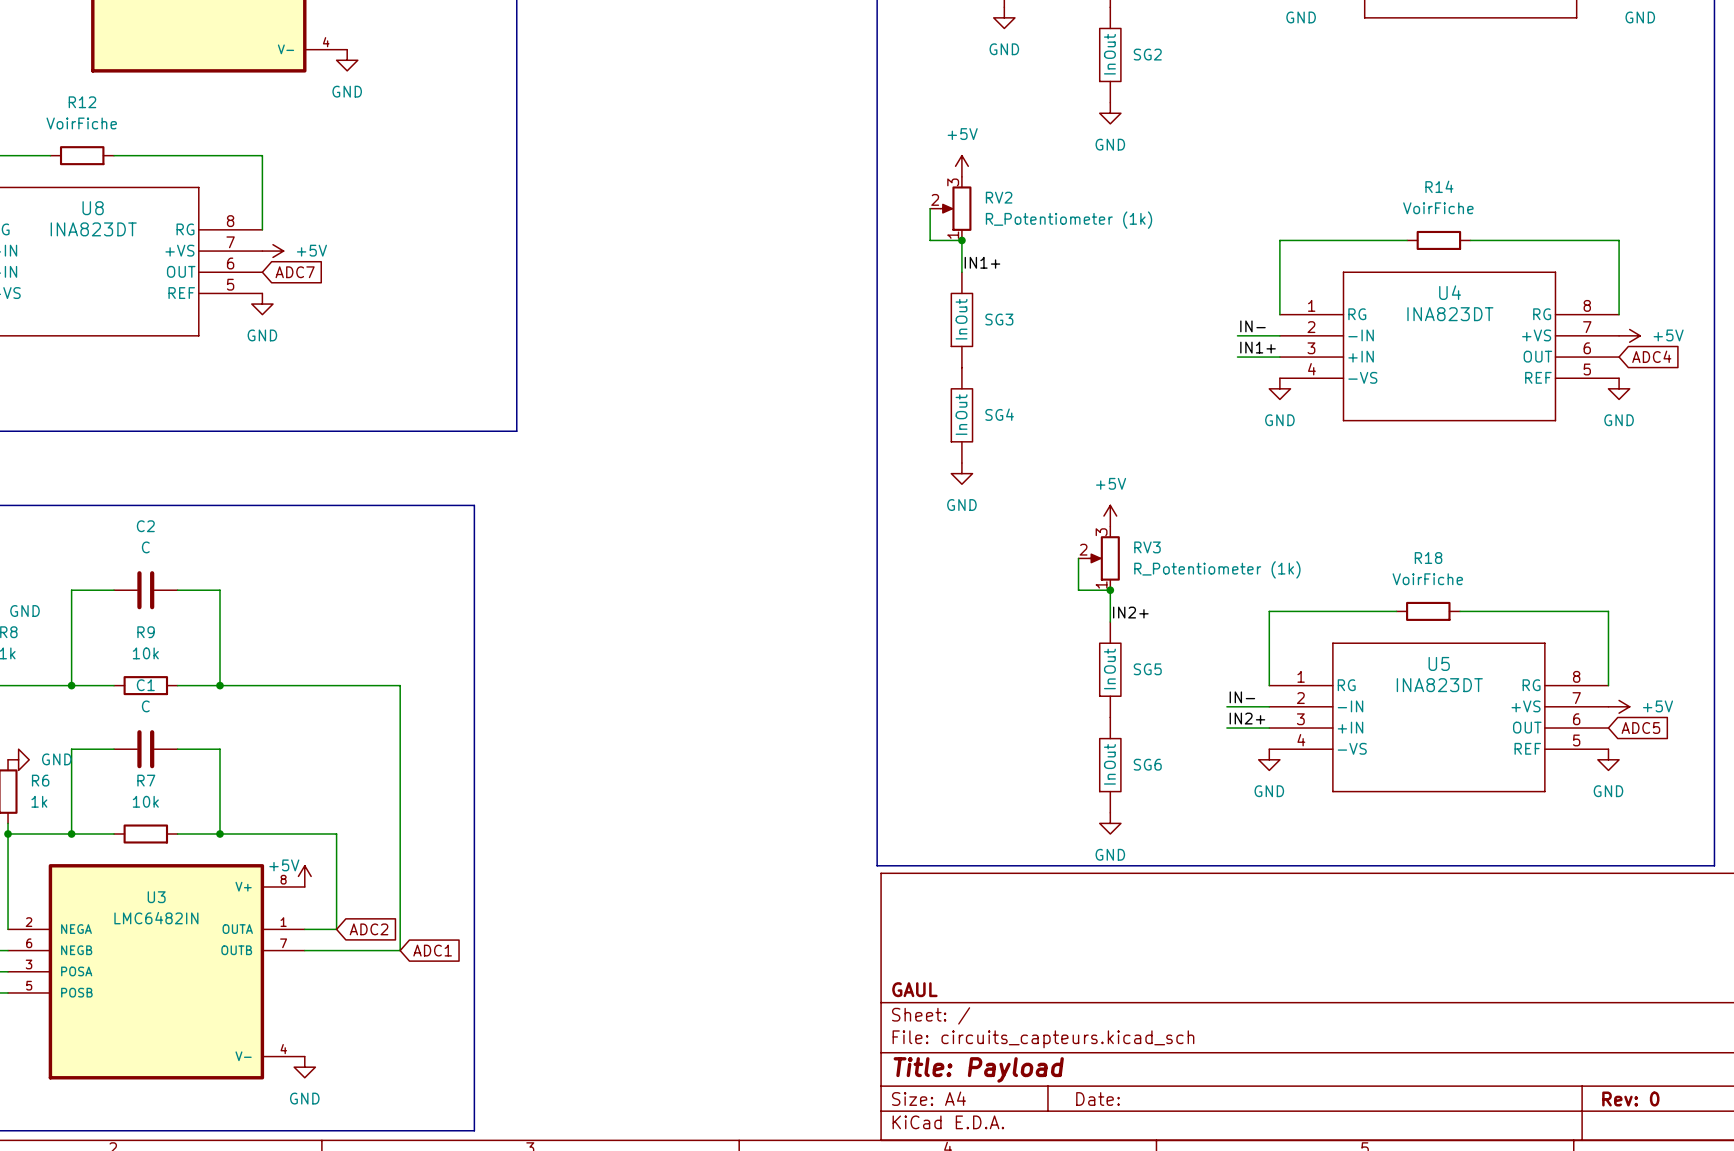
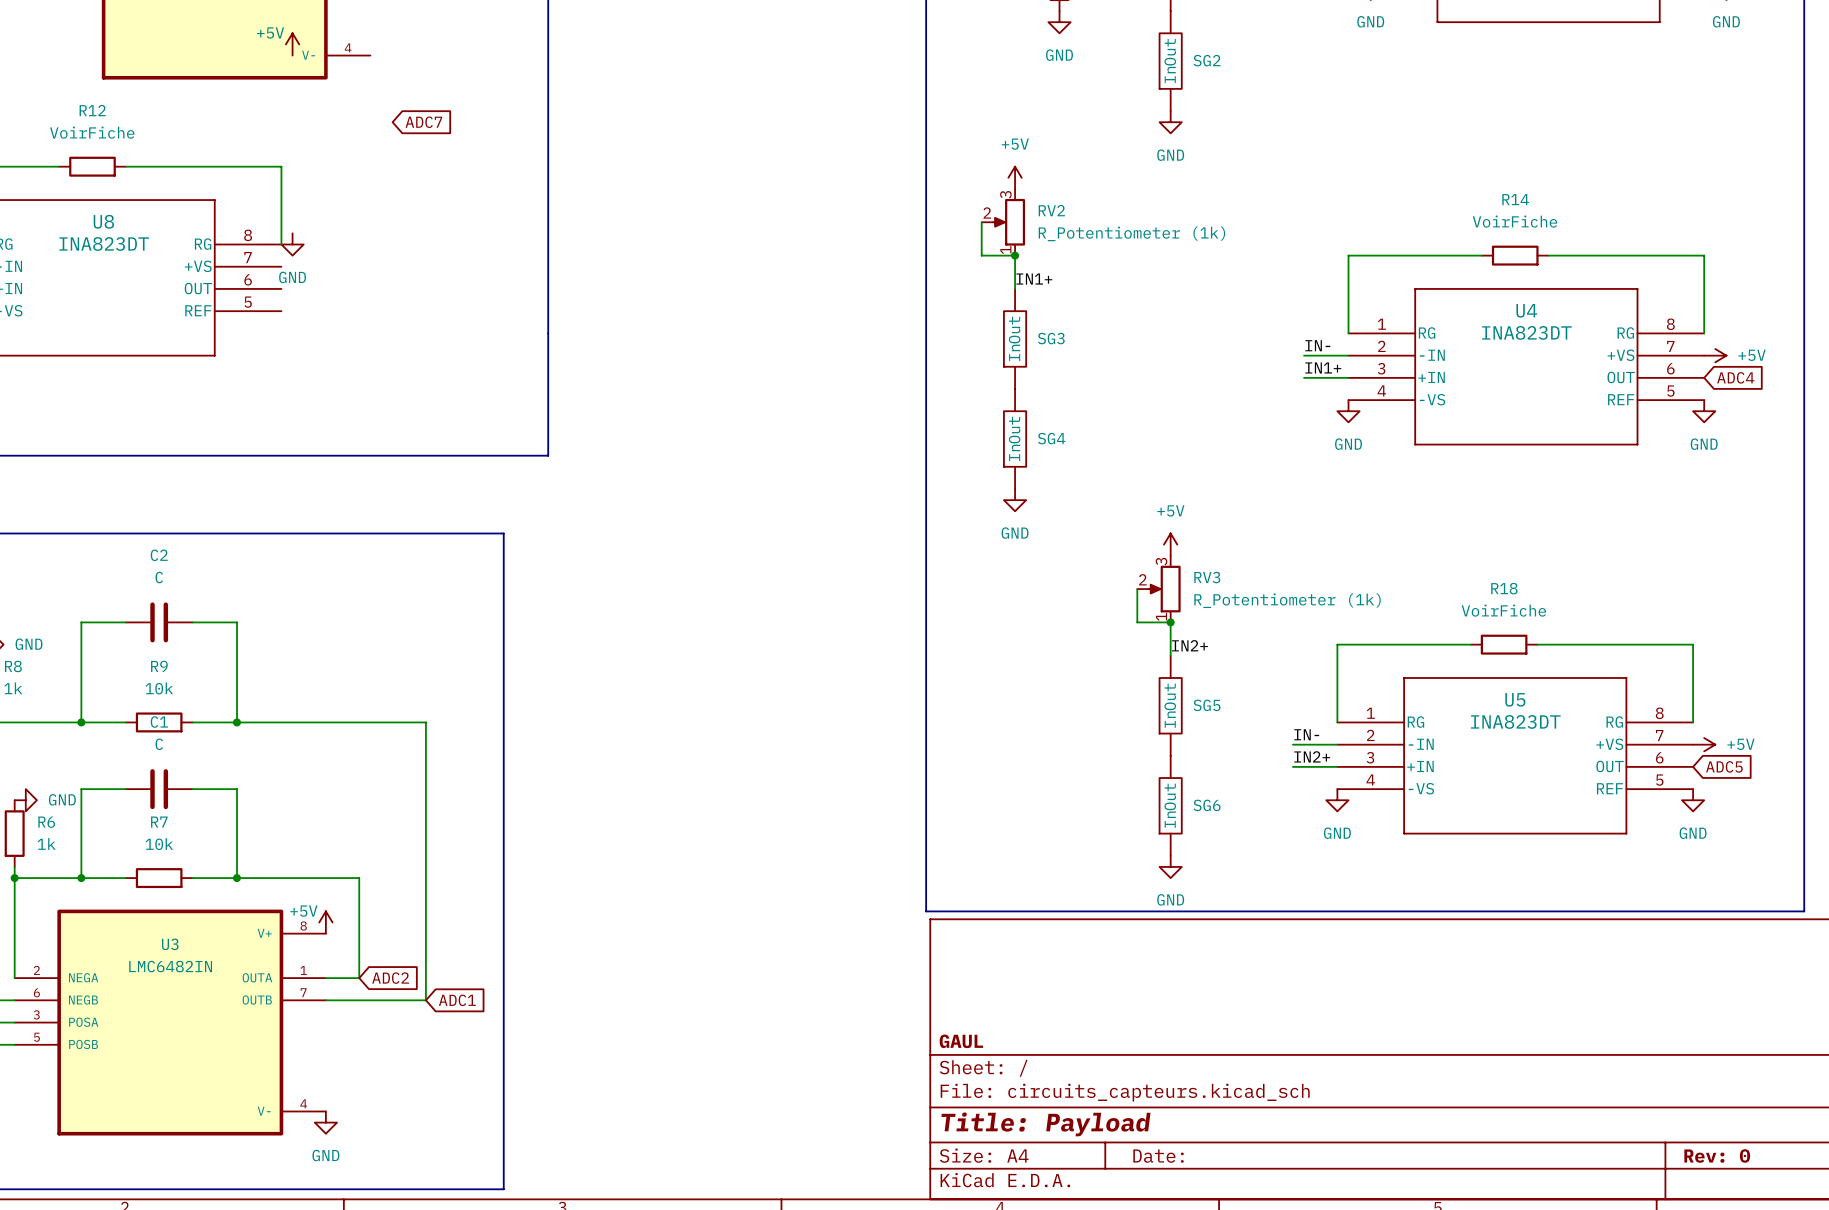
power symbol: none -> +5V (292, 44)
power symbol: GND (347, 60) -> none
power symbol: +5V (272, 251) -> none
global label position: ADC7 (295, 272) -> ADC7 (423, 122)
power symbol position: GND (262, 304) -> GND (292, 244)

